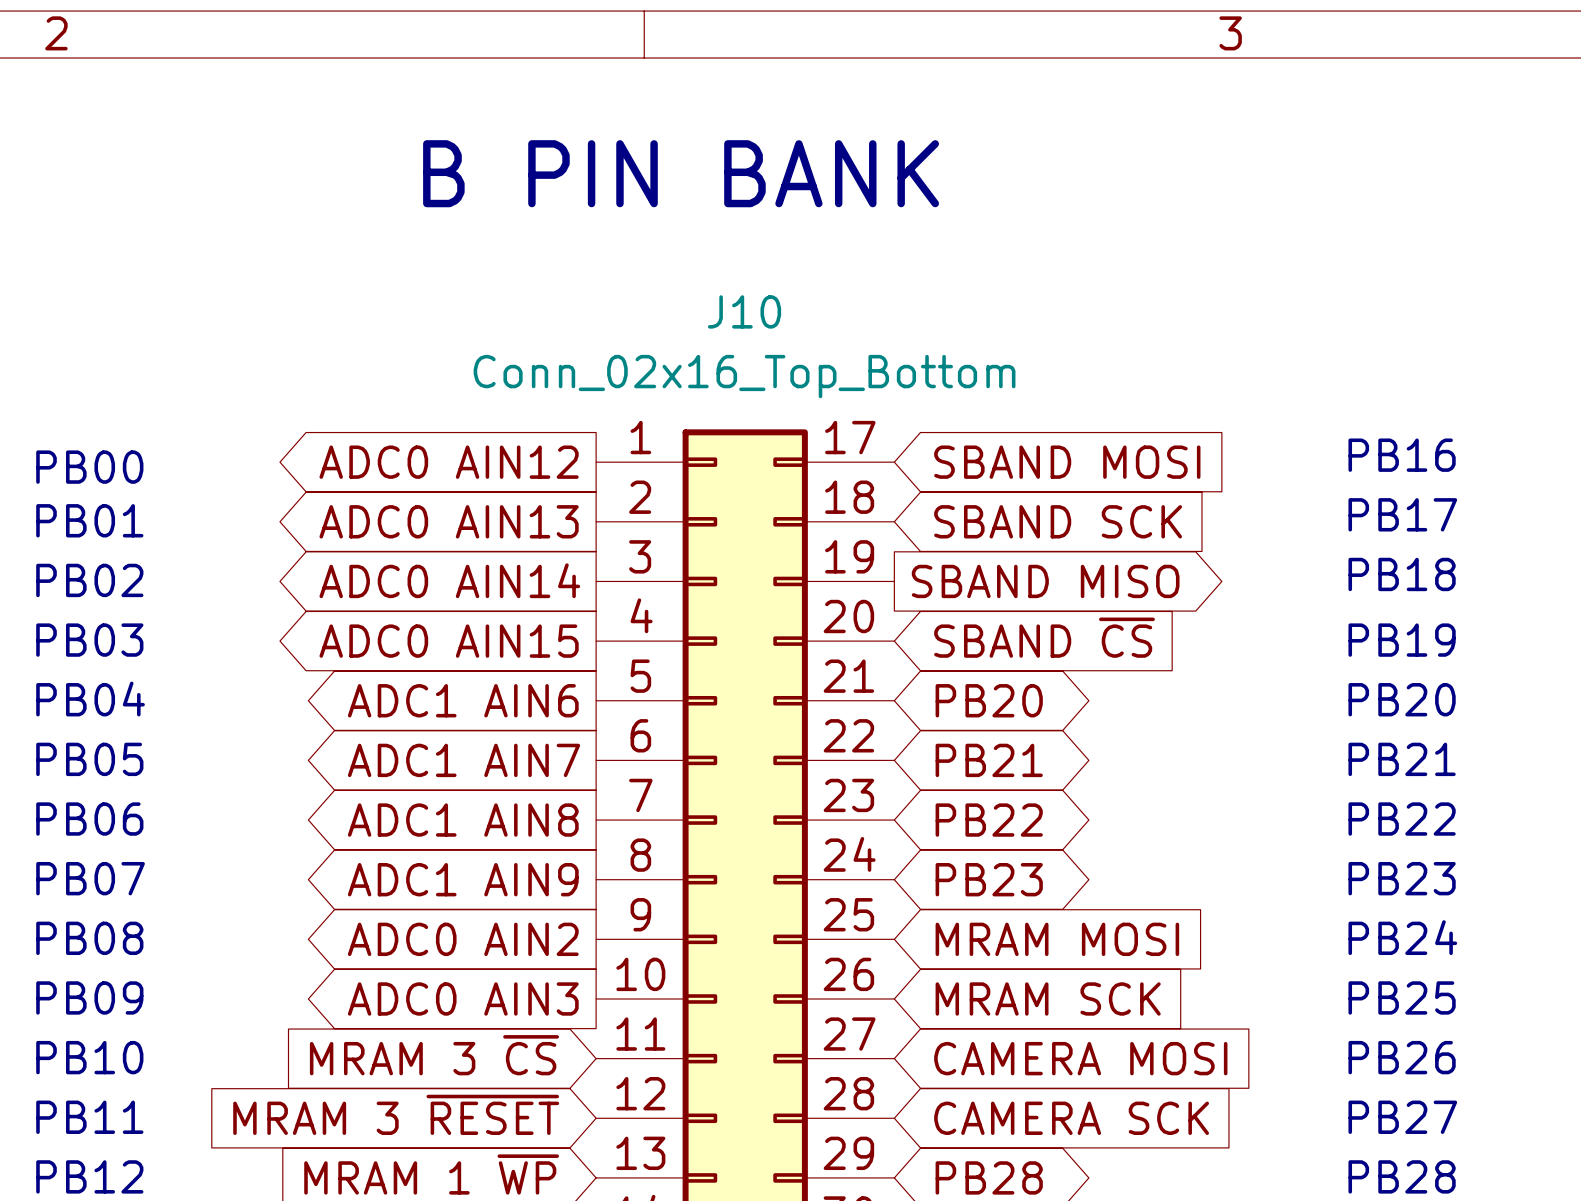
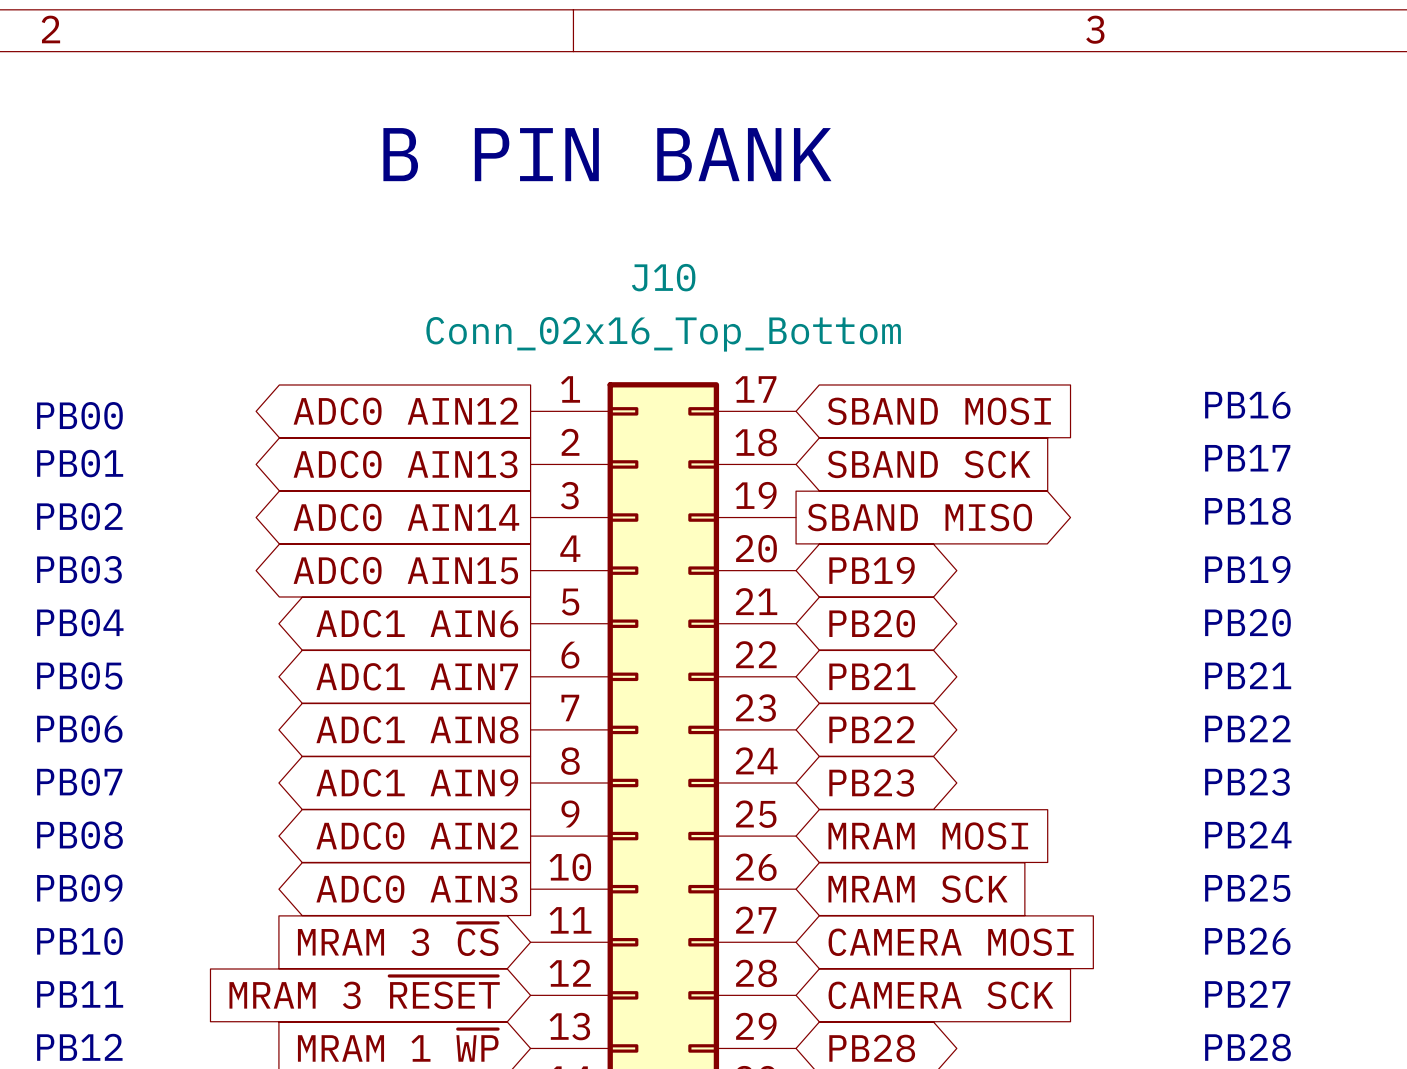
global label shape: input (1044, 637) -> bidirectional (872, 570)
global label: SBAND ~{CS} (1044, 637) -> PB19 (872, 570)

